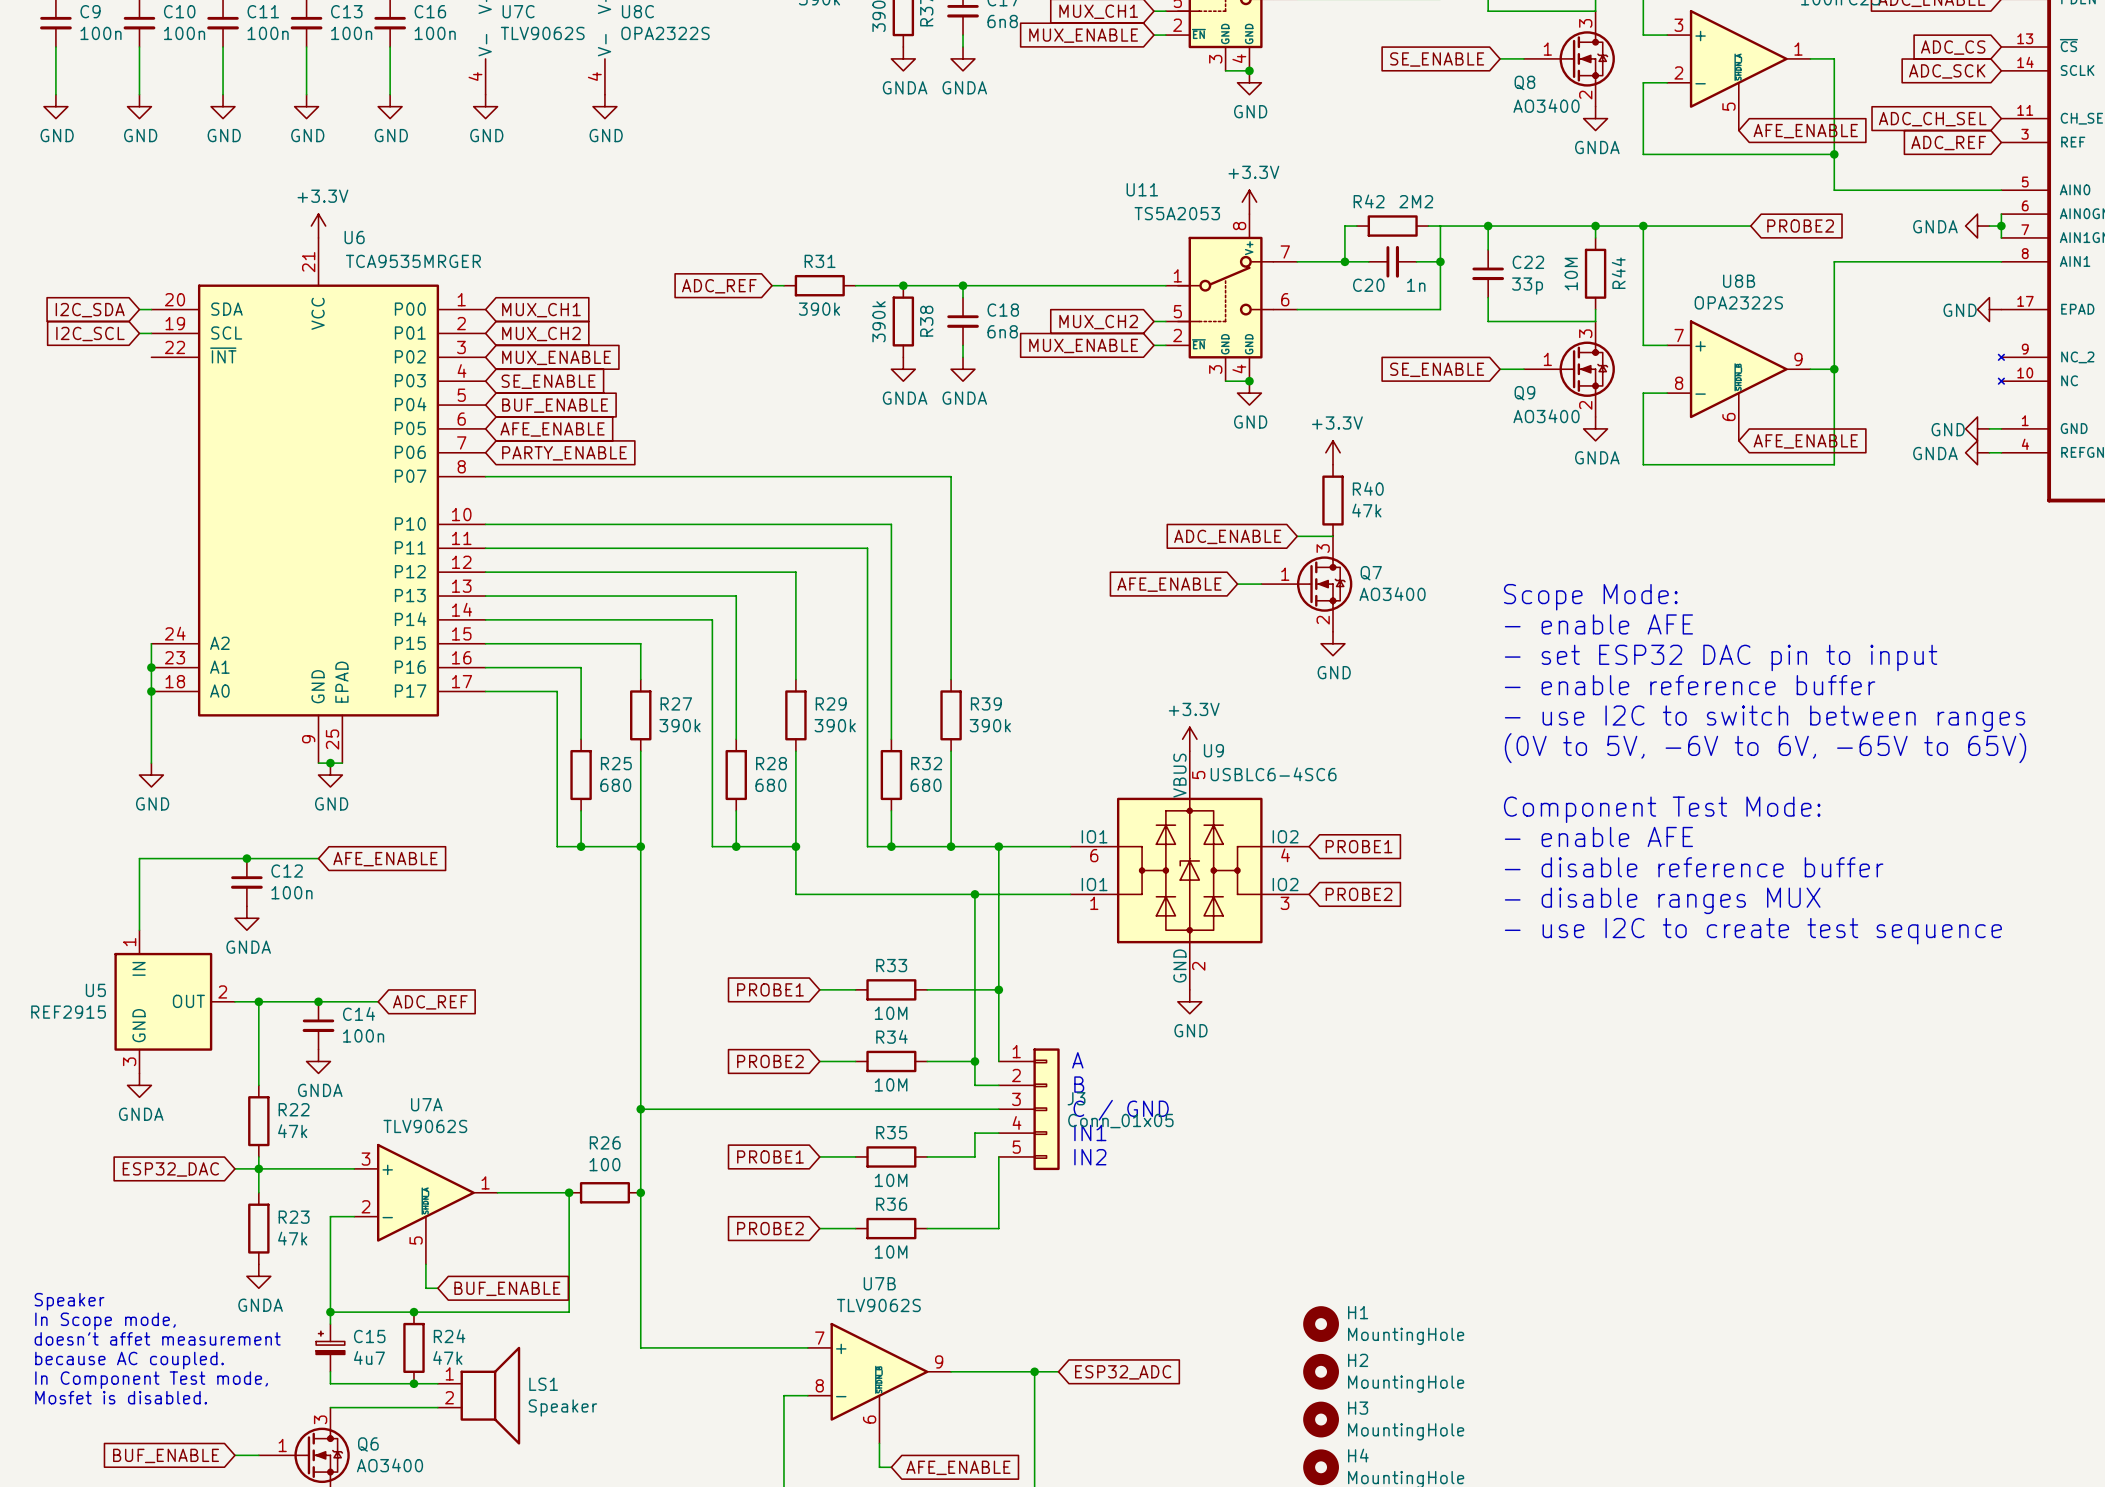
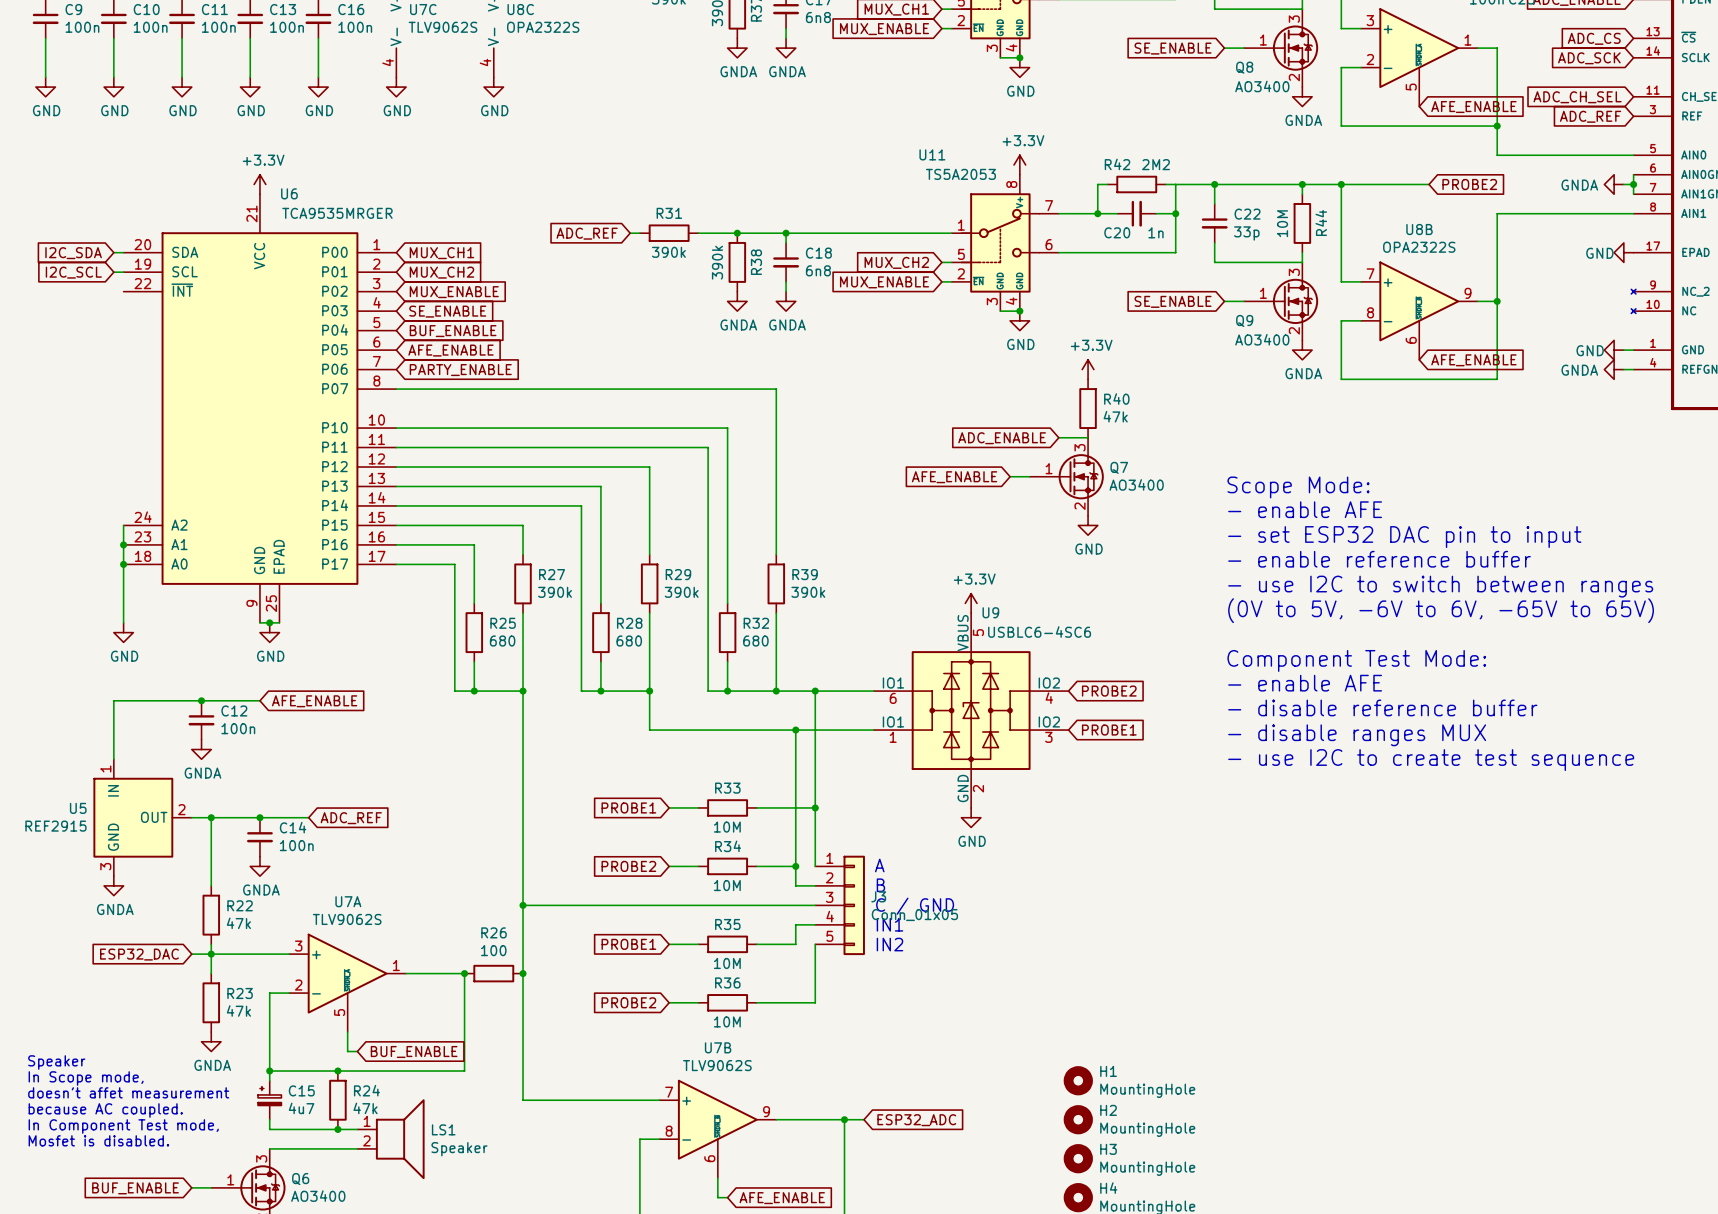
global label: PROBE1 (1359, 846) -> PROBE2 (1109, 691)
global label: PROBE2 (1359, 894) -> PROBE1 (1109, 730)

